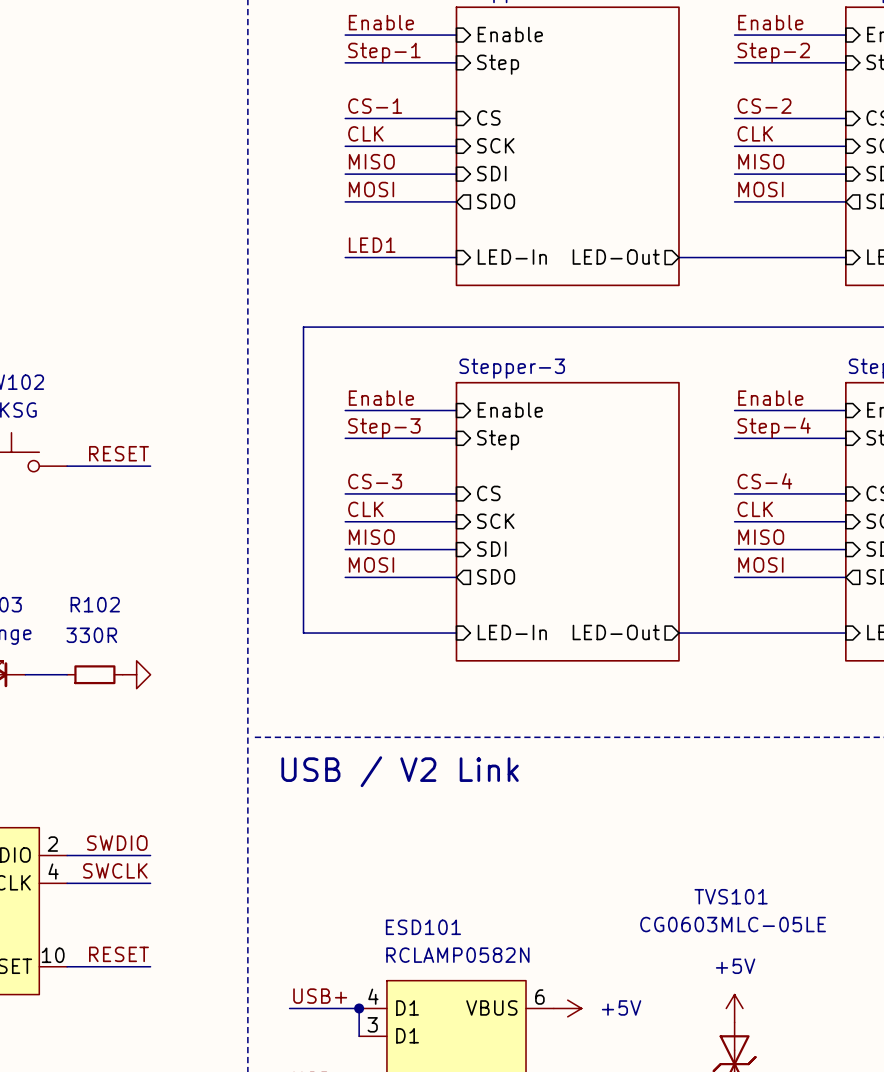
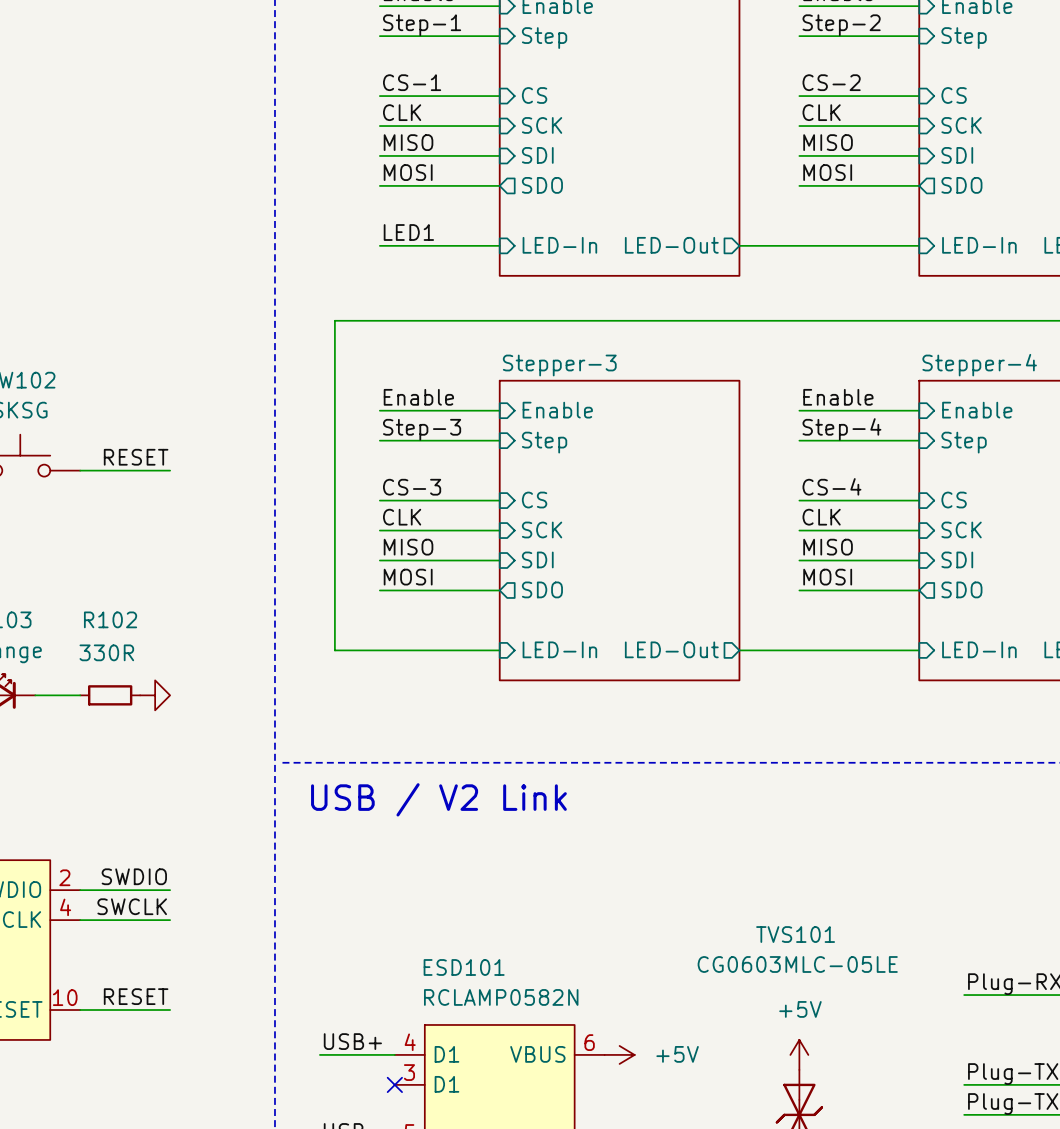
wire: (359, 1008) (359, 1036) -> none
junction: (359, 1008) -> none
no-connect mark: none -> (394, 1084)

